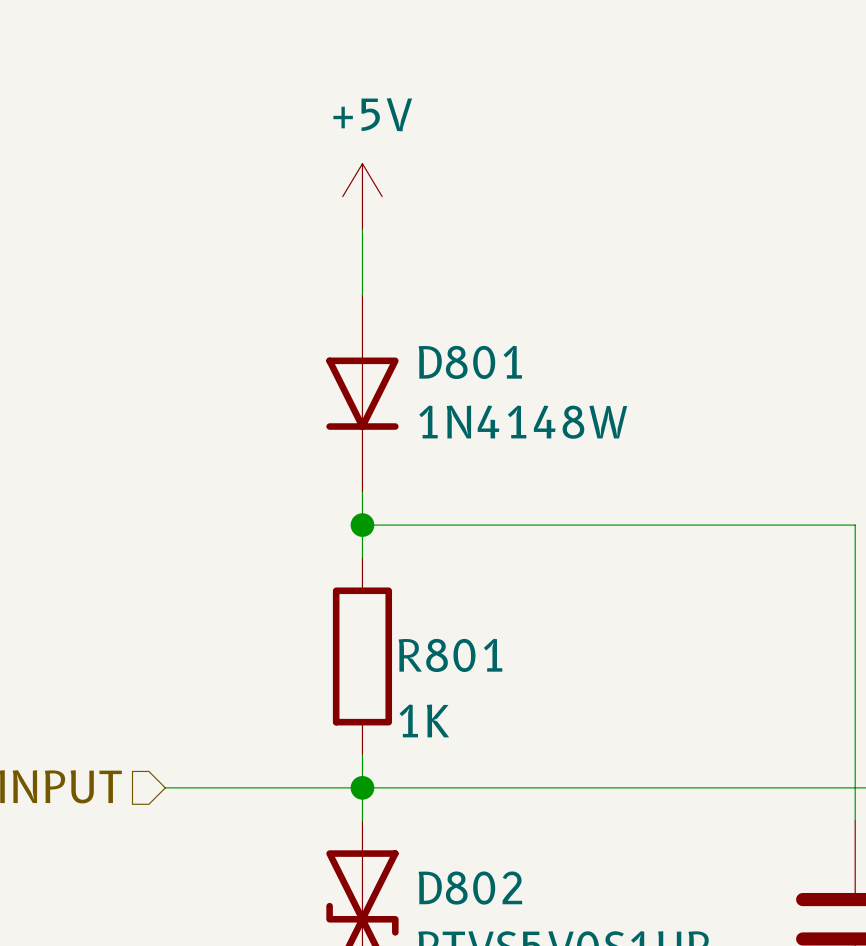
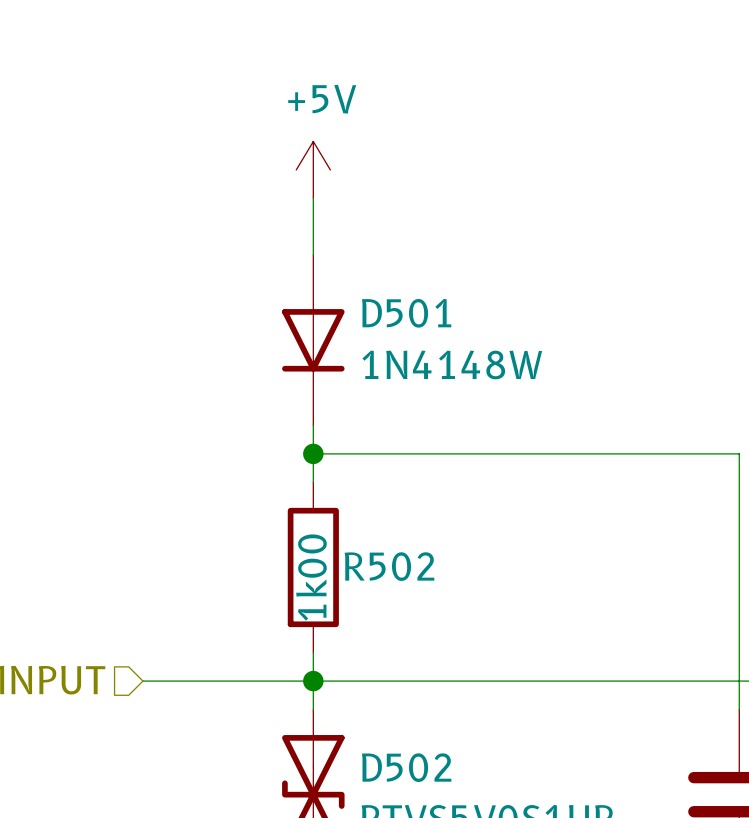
D801 name: D801 (470, 362) -> D501 (406, 313)
R801 name: R801 (450, 655) -> R502 (389, 566)
R801 value: 1K (424, 720) -> 1k00 (311, 577)
D802 name: D802 (470, 888) -> D502 (406, 767)

